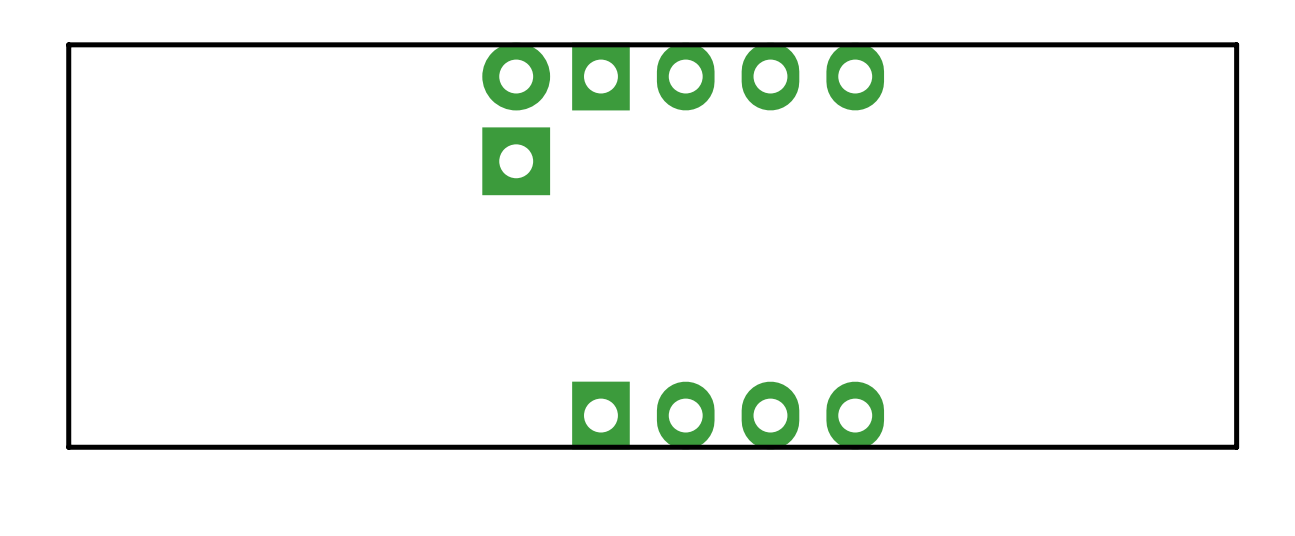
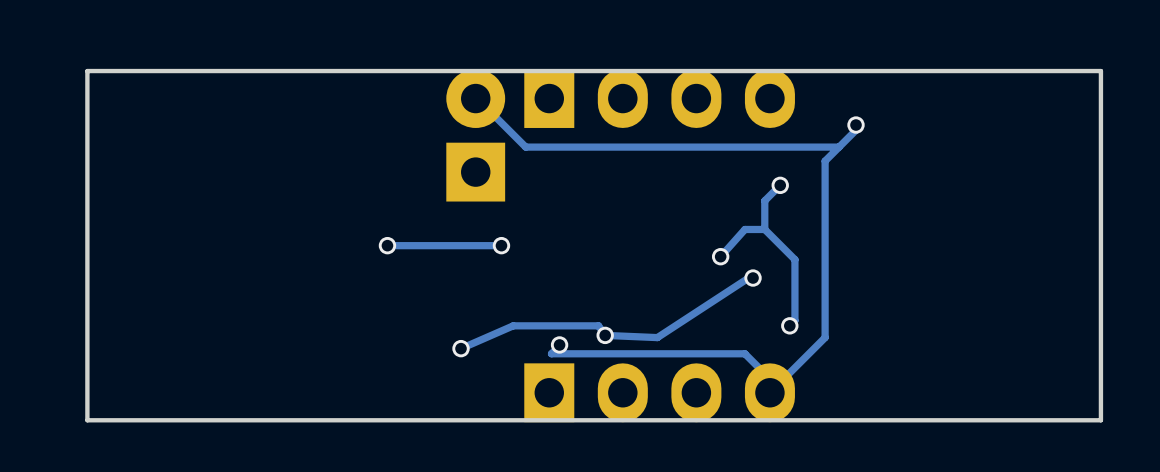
track: none -> (475, 98) (525, 147) (839, 147)
track: none -> (856, 125) (856, 130) (825, 161) (825, 337) (769, 392) (769, 378) (744, 353) (551, 353) (559, 344)
via: none -> (856, 125)
track: none -> (780, 185) (764, 200) (764, 229)
via: none -> (780, 185)
track: none -> (764, 229) (744, 229) (720, 256)
track: none -> (764, 229) (794, 259) (794, 320) (789, 325)
via: none -> (387, 245)
track: none -> (501, 245) (387, 245)
via: none -> (501, 245)
via: none -> (720, 256)
track: none -> (748, 278) (657, 337) (605, 335) (598, 325) (513, 325) (461, 348)
via: none -> (753, 278)
via: none -> (789, 325)
via: none -> (605, 335)
via: none -> (559, 344)
via: none -> (461, 348)

